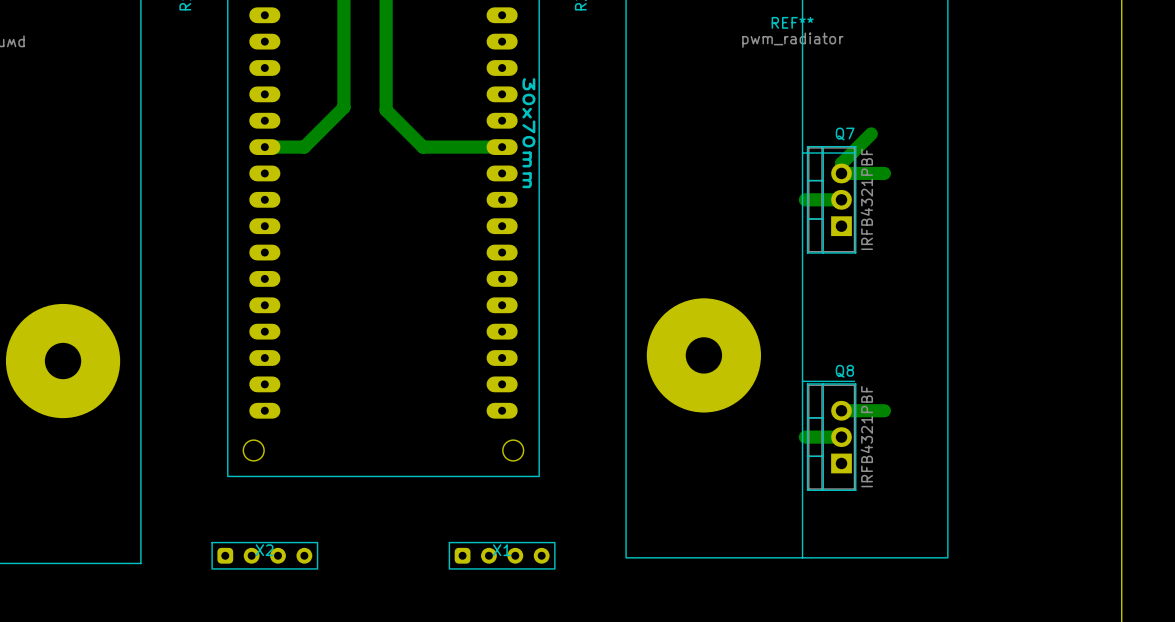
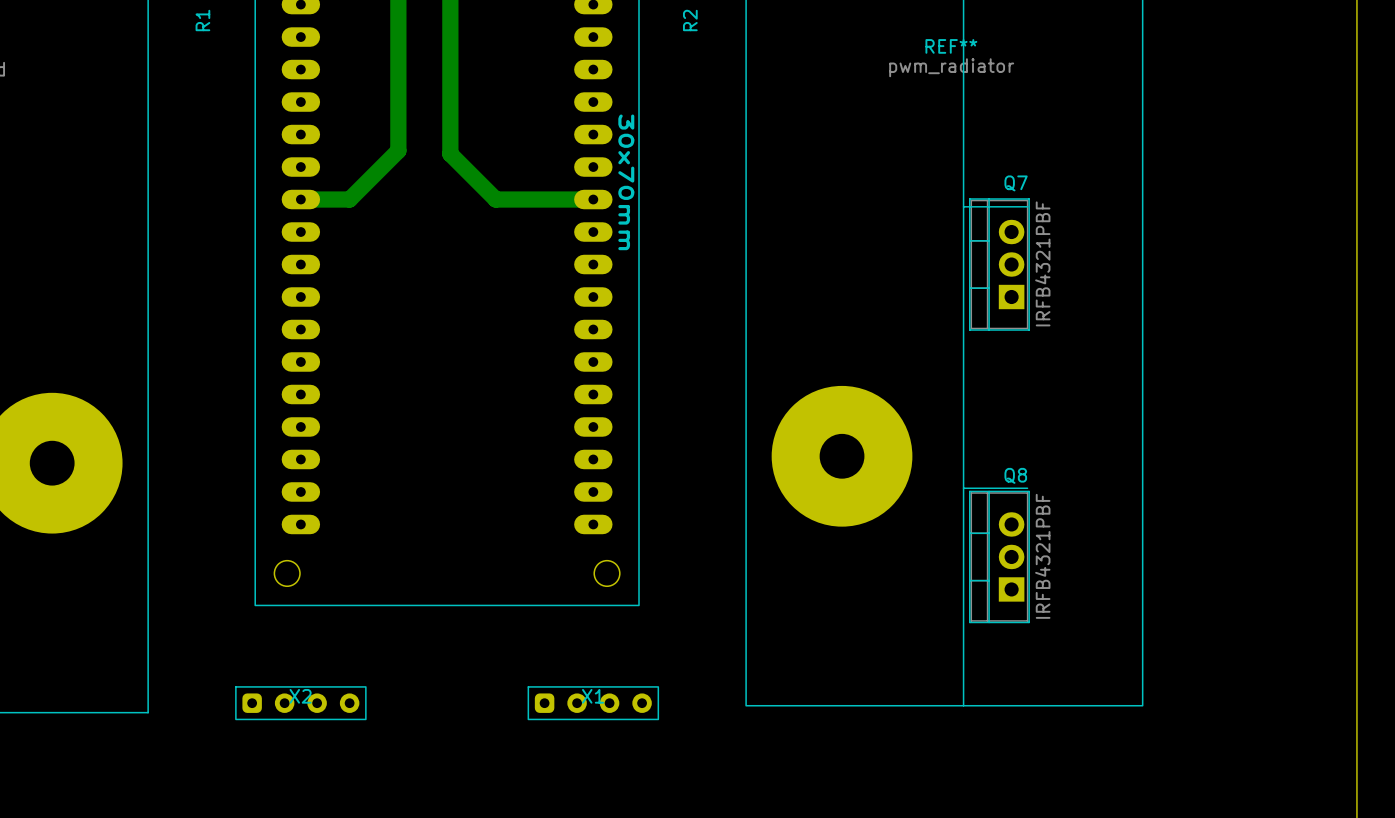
bottom track: (871, 133) (841, 163) (841, 173) (884, 173) -> none
bottom track: (805, 199) (841, 199) -> none
bottom track: (841, 410) (884, 410) -> none
bottom track: (805, 437) (841, 437) -> none

